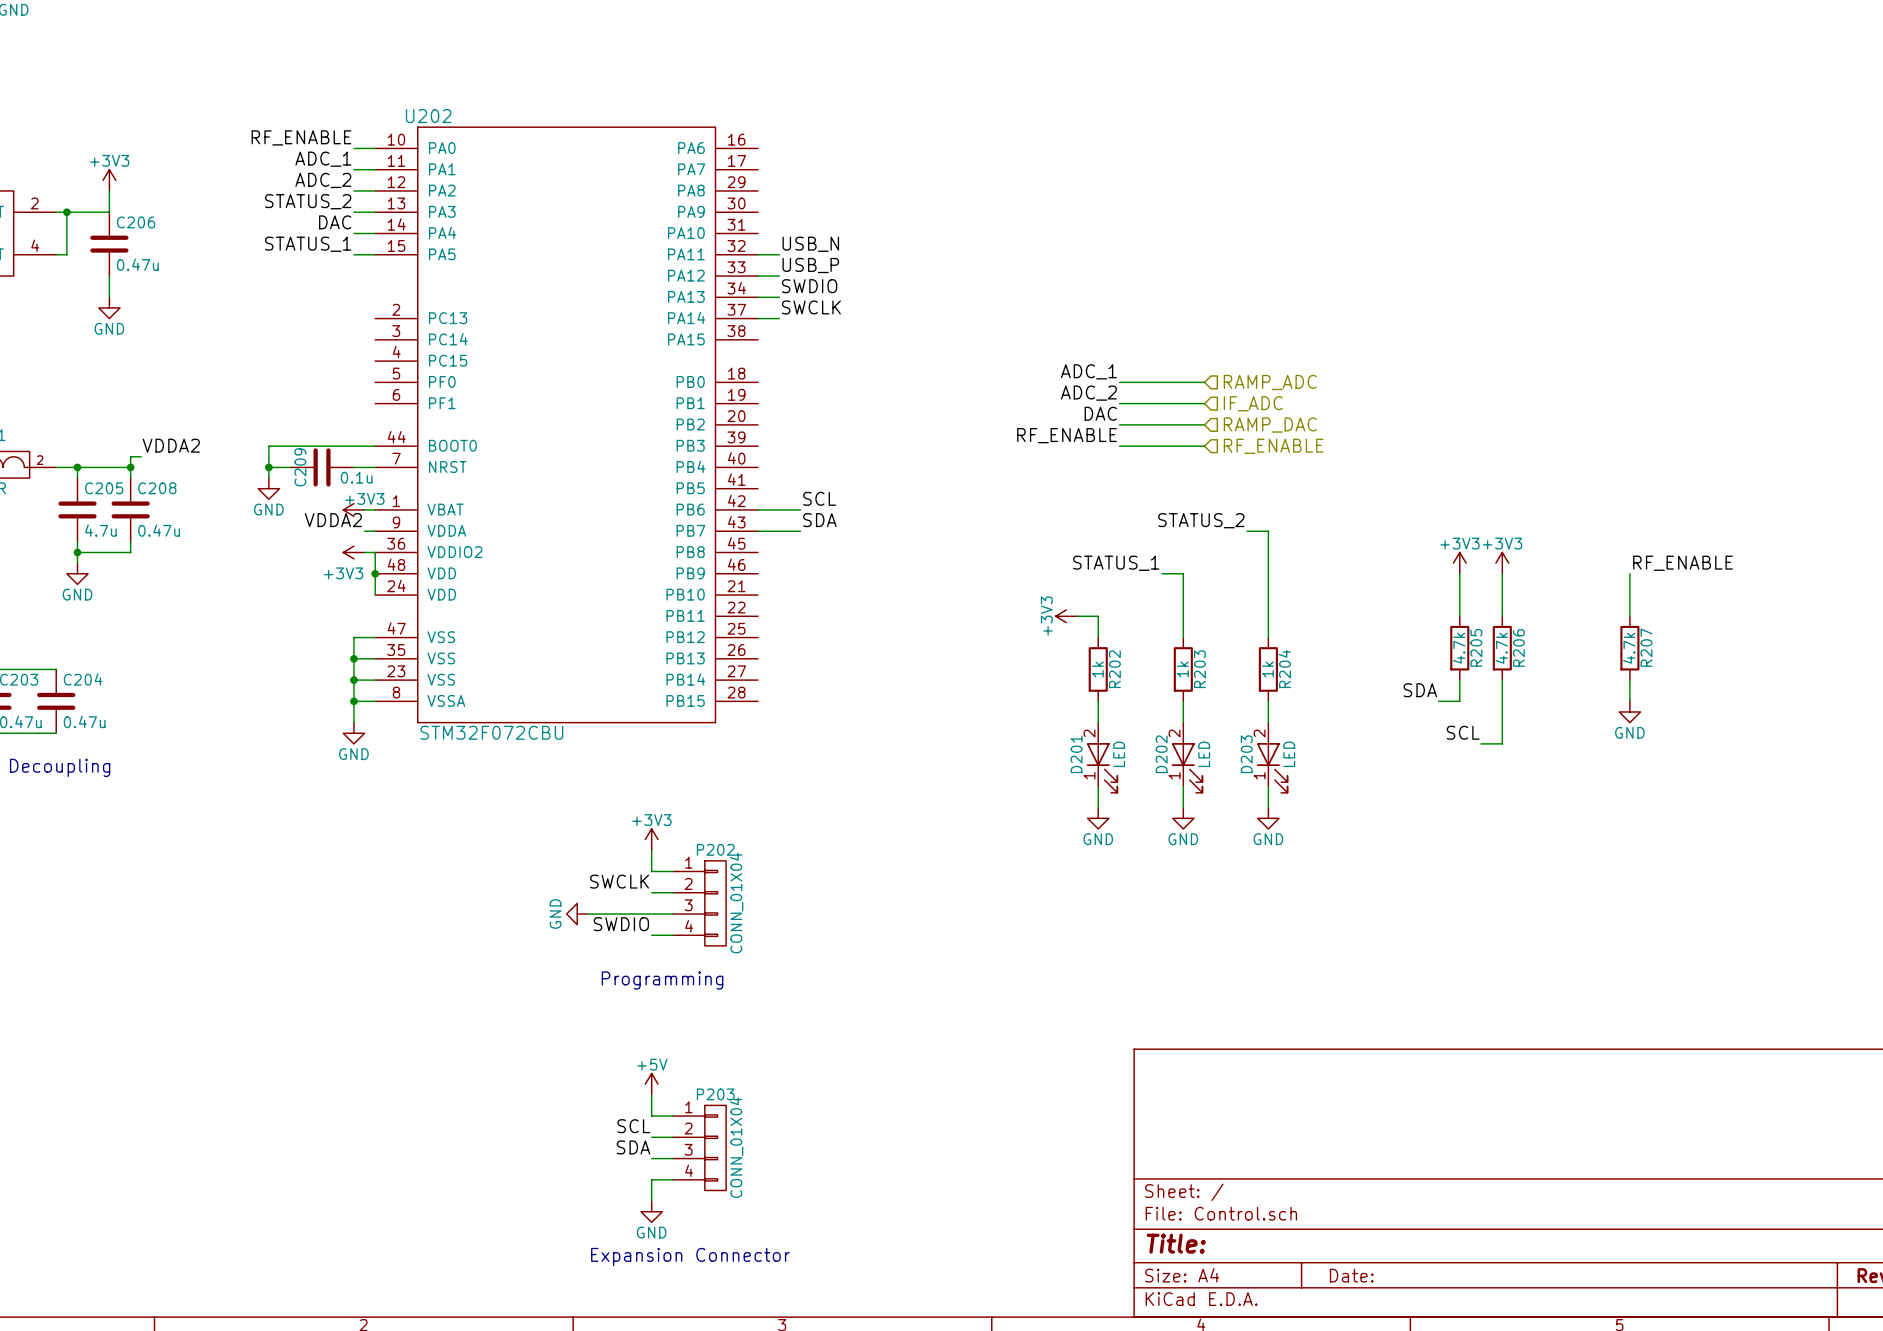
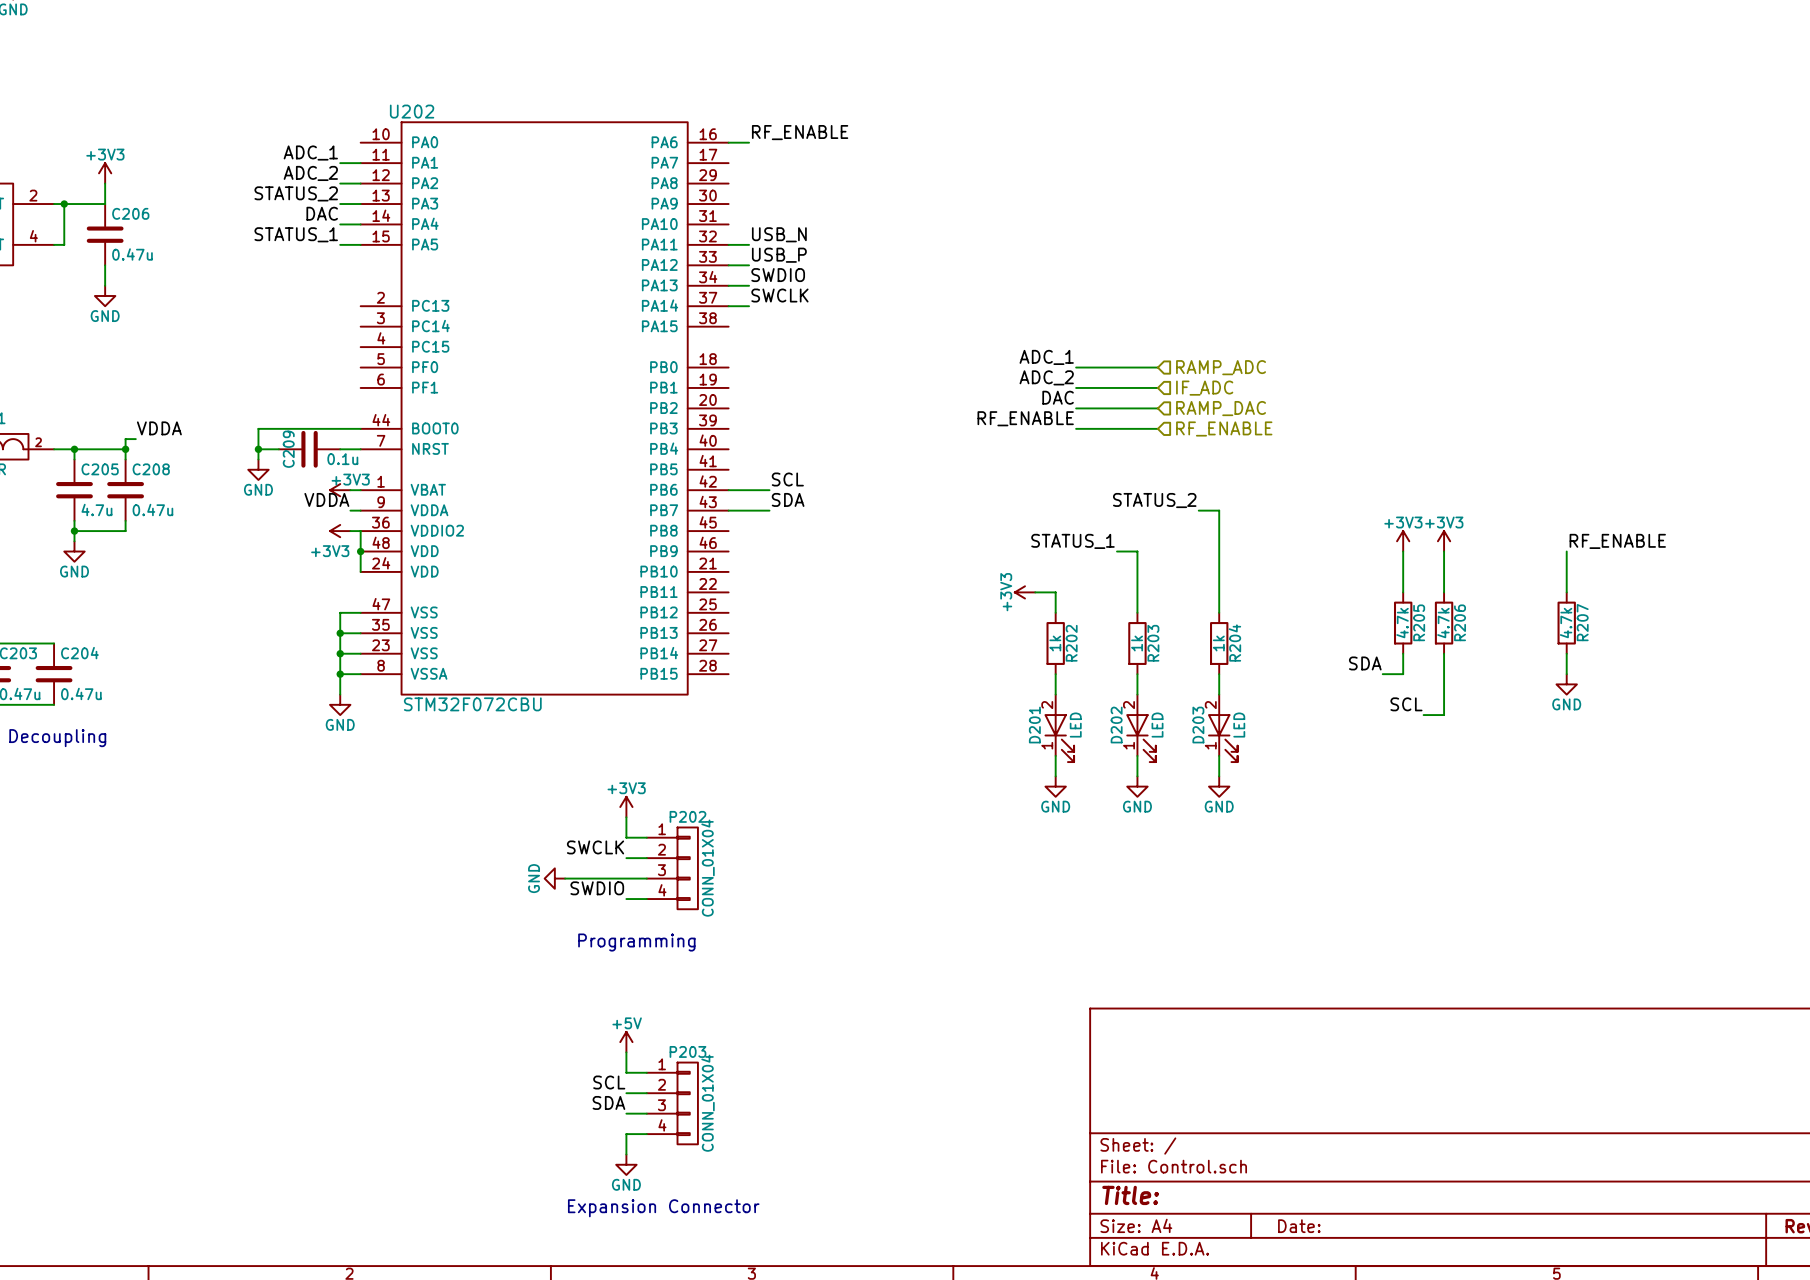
label: RF_ENABLE (301, 137) -> none
label: none -> RF_ENABLE (800, 132)
wire: (353, 148) (375, 148) -> none
wire: none -> (728, 142) (749, 142)
label: VDDA2 (171, 445) -> VDDA (159, 428)
label: VDDA2 (333, 520) -> VDDA (326, 499)

